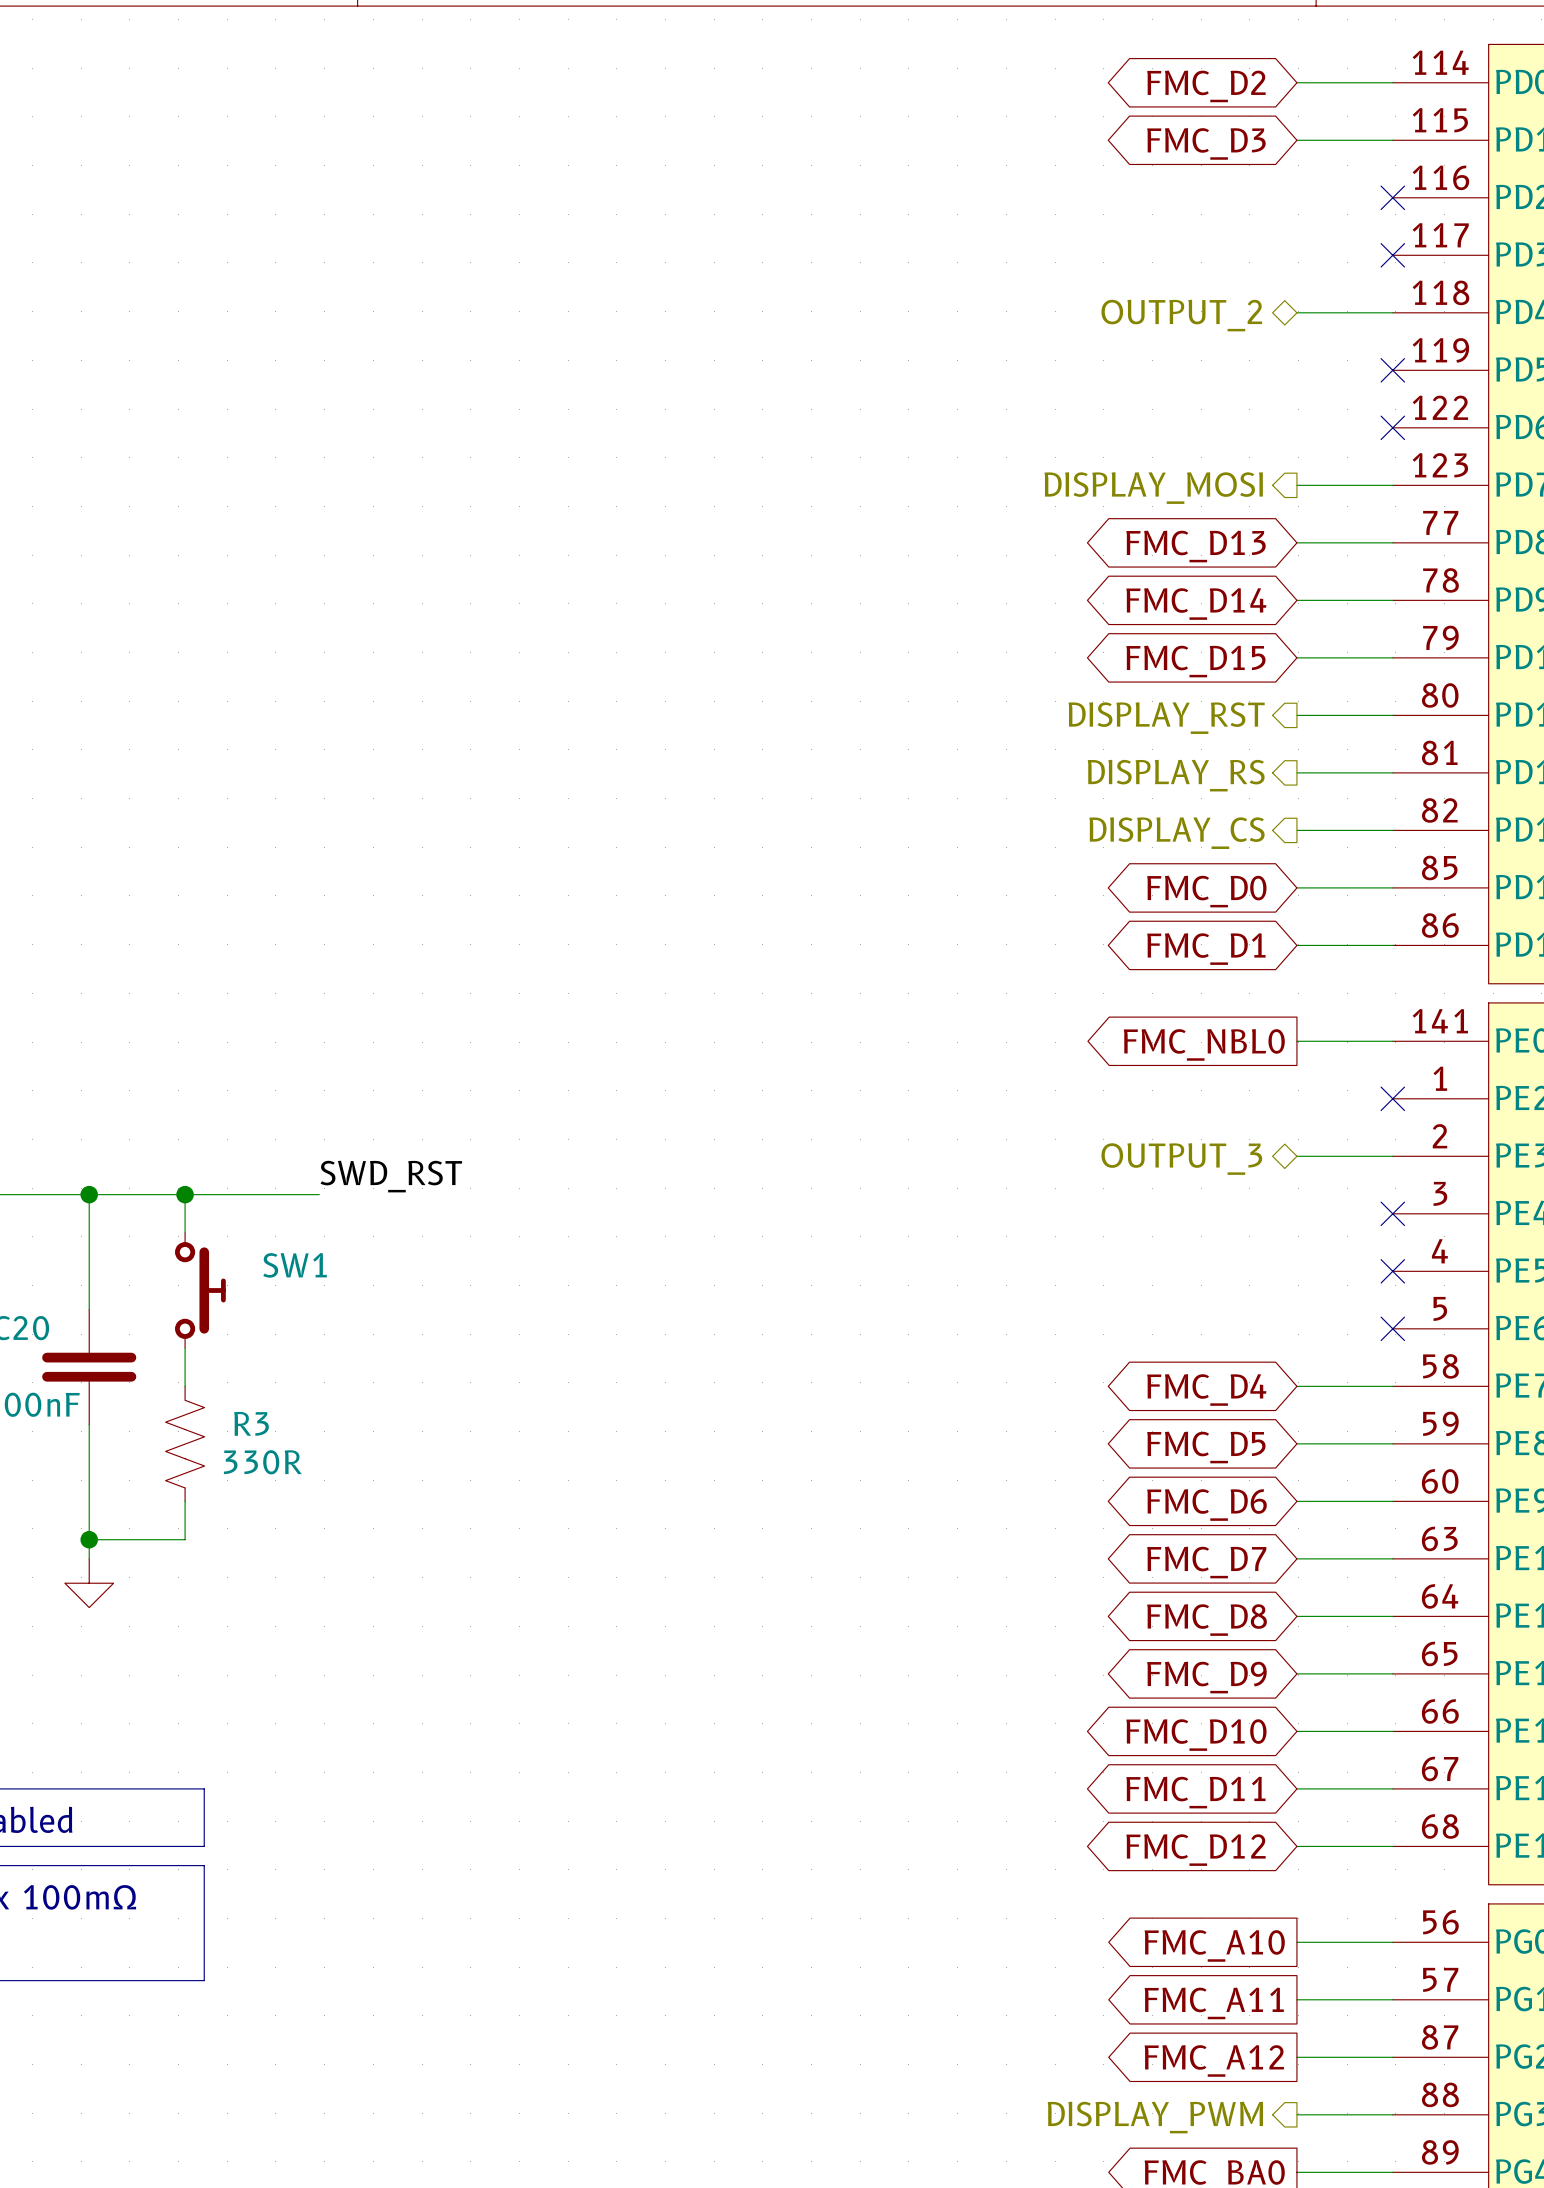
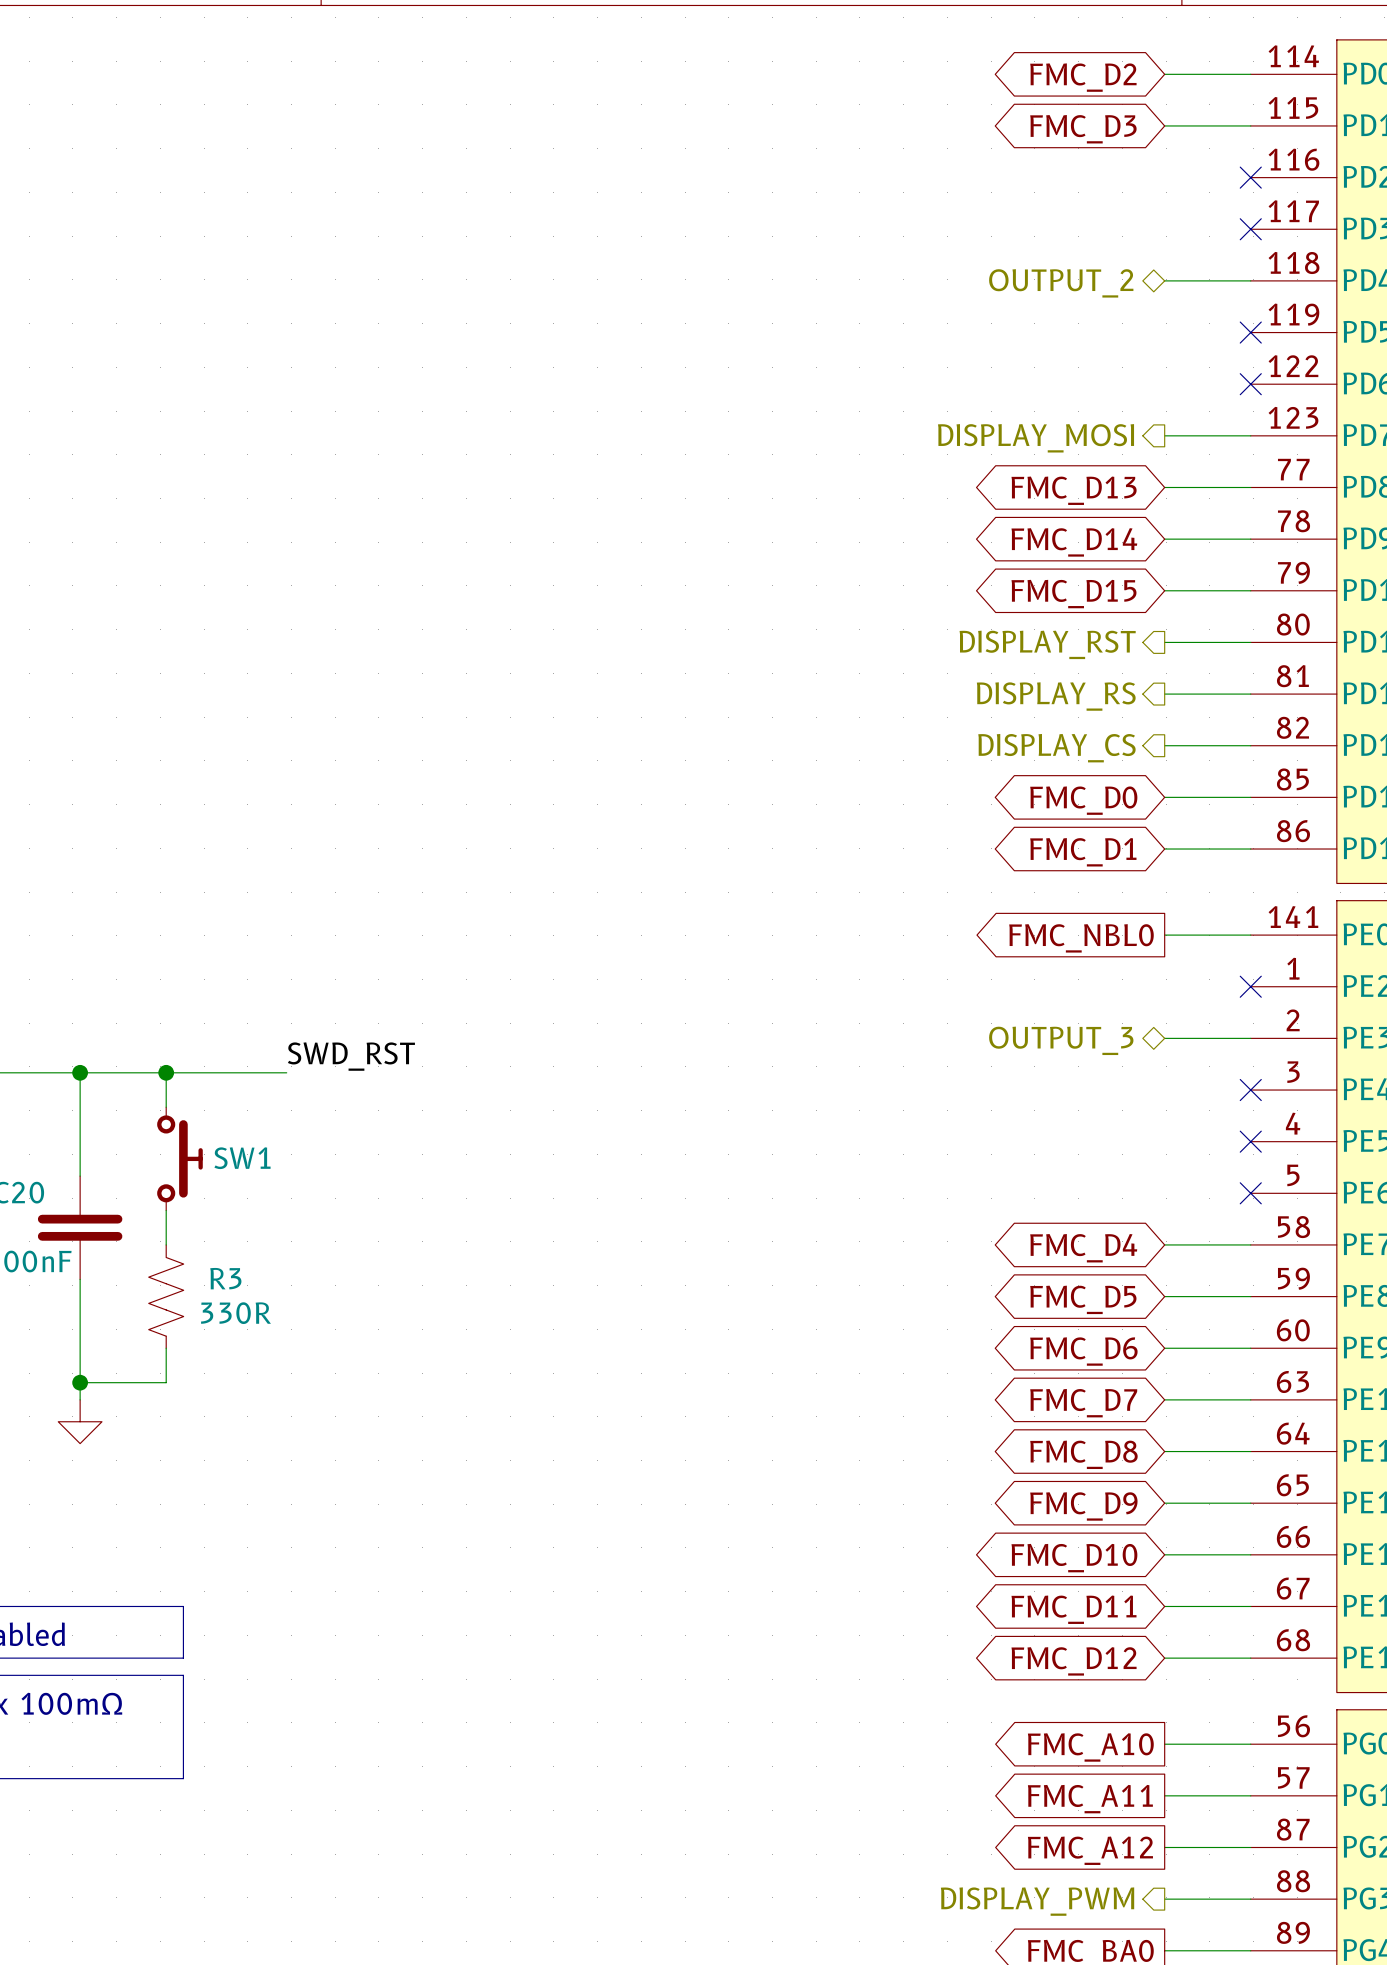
SW1 name position: SW1 (295, 1265) -> SW1 (242, 1158)

